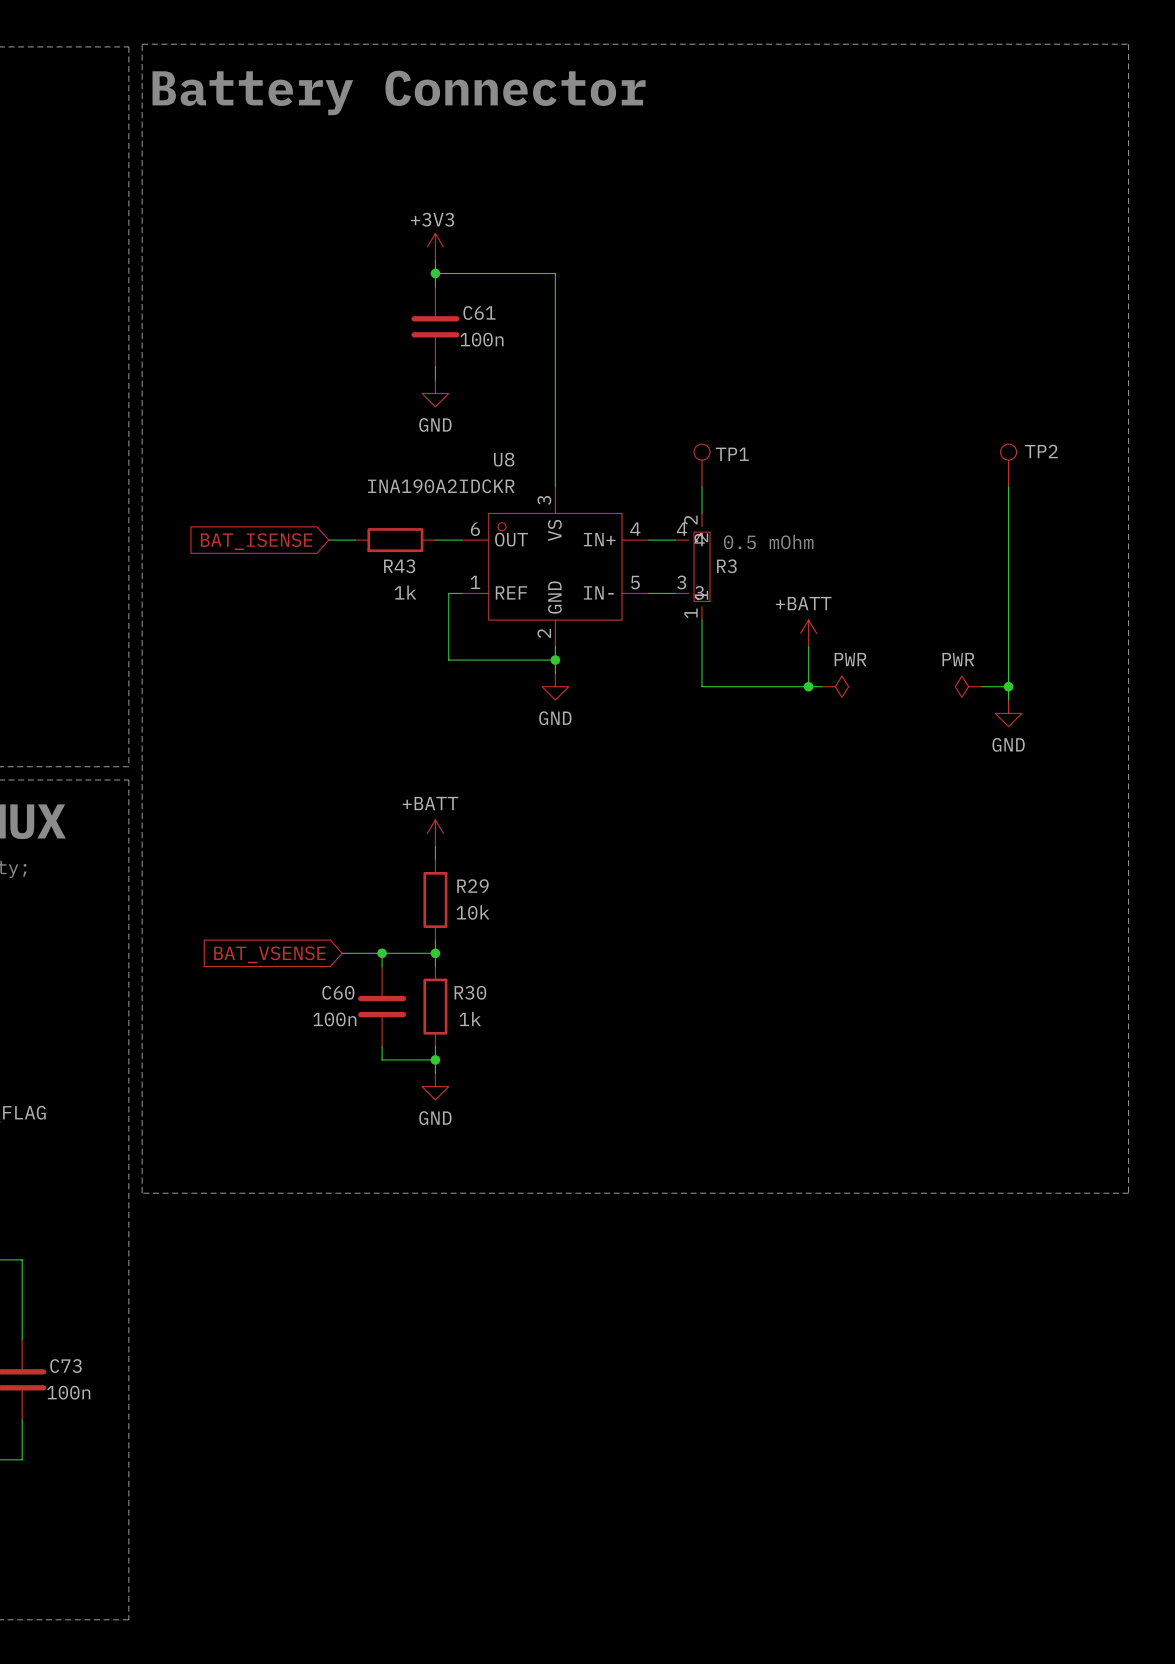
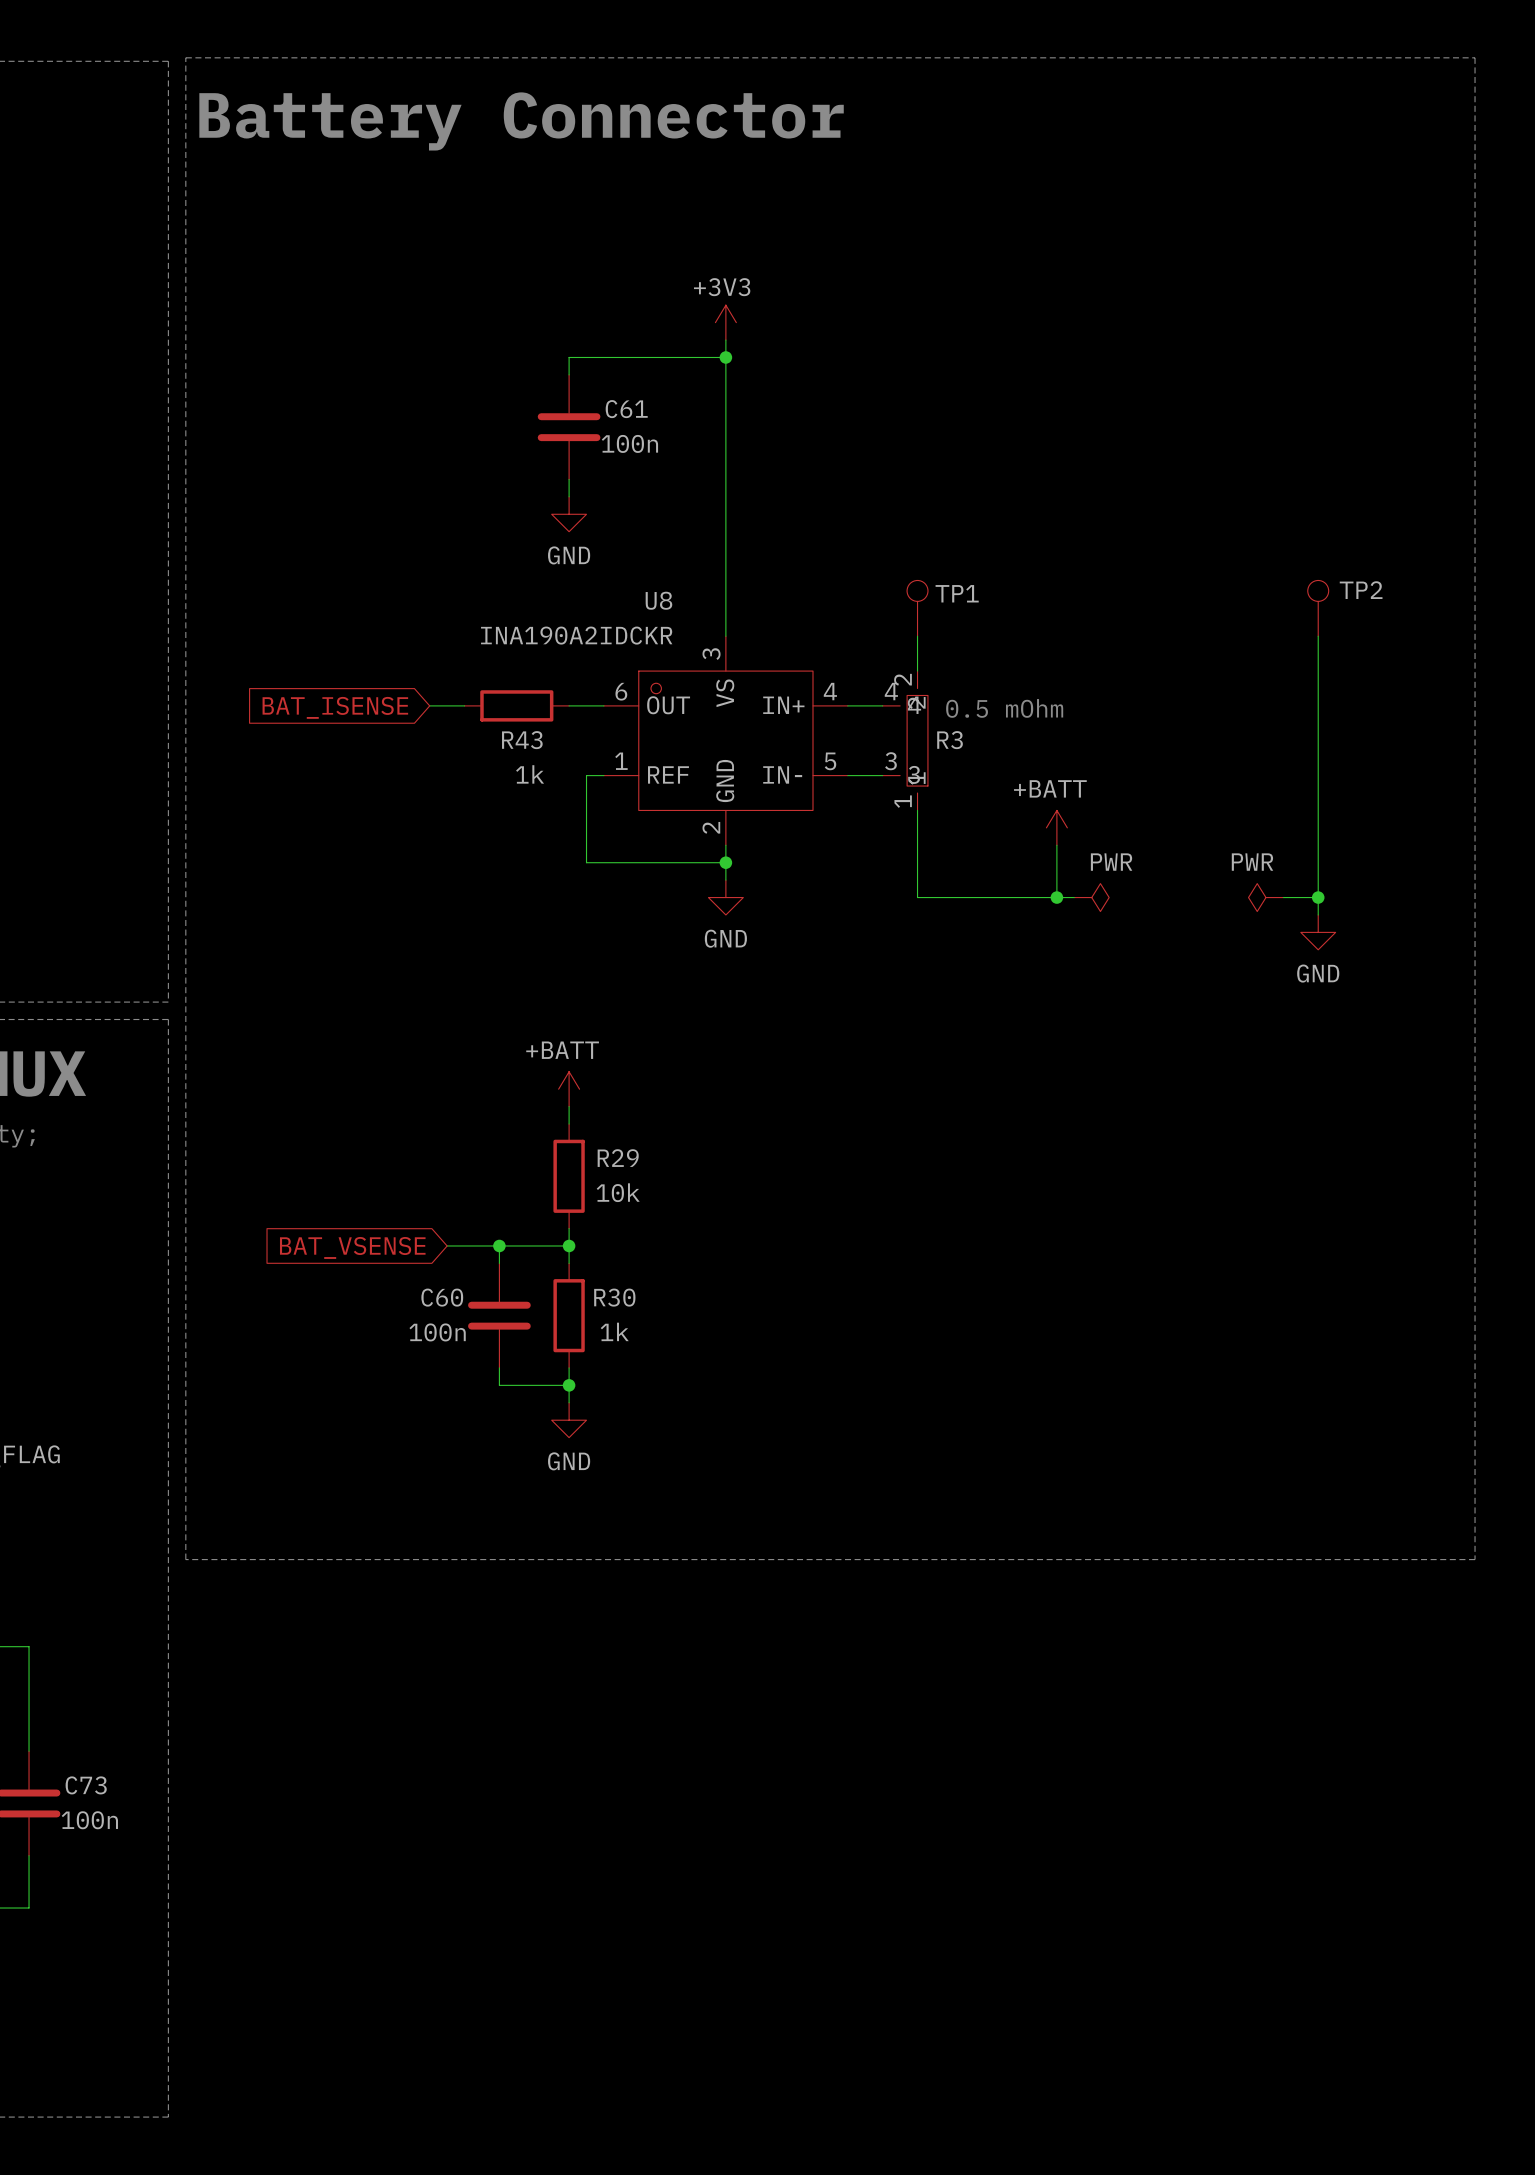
power symbol position: +3V3 (435, 246) -> +3V3 (725, 322)
wire: (435, 260) (435, 273) -> (725, 340) (725, 357)
junction: (435, 273) -> none
junction: none -> (725, 357)

